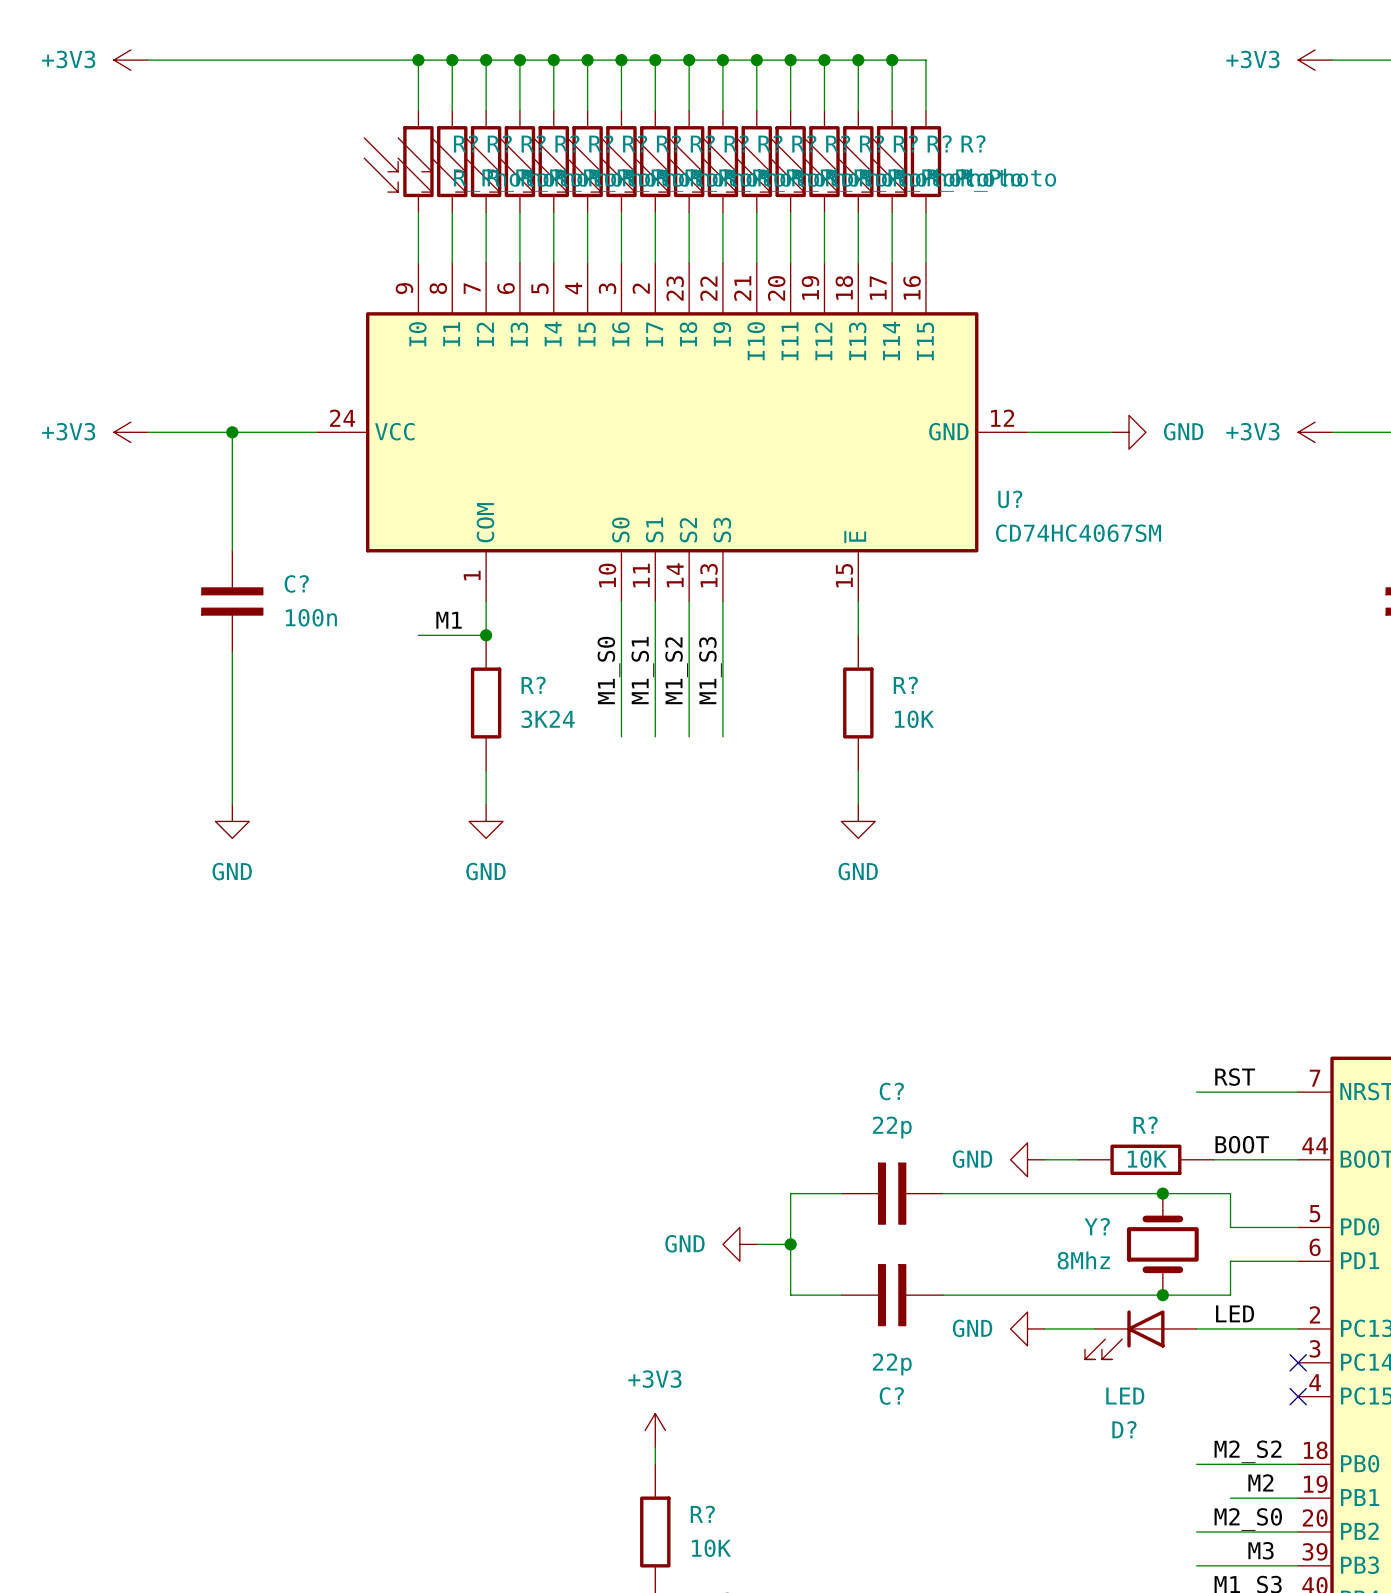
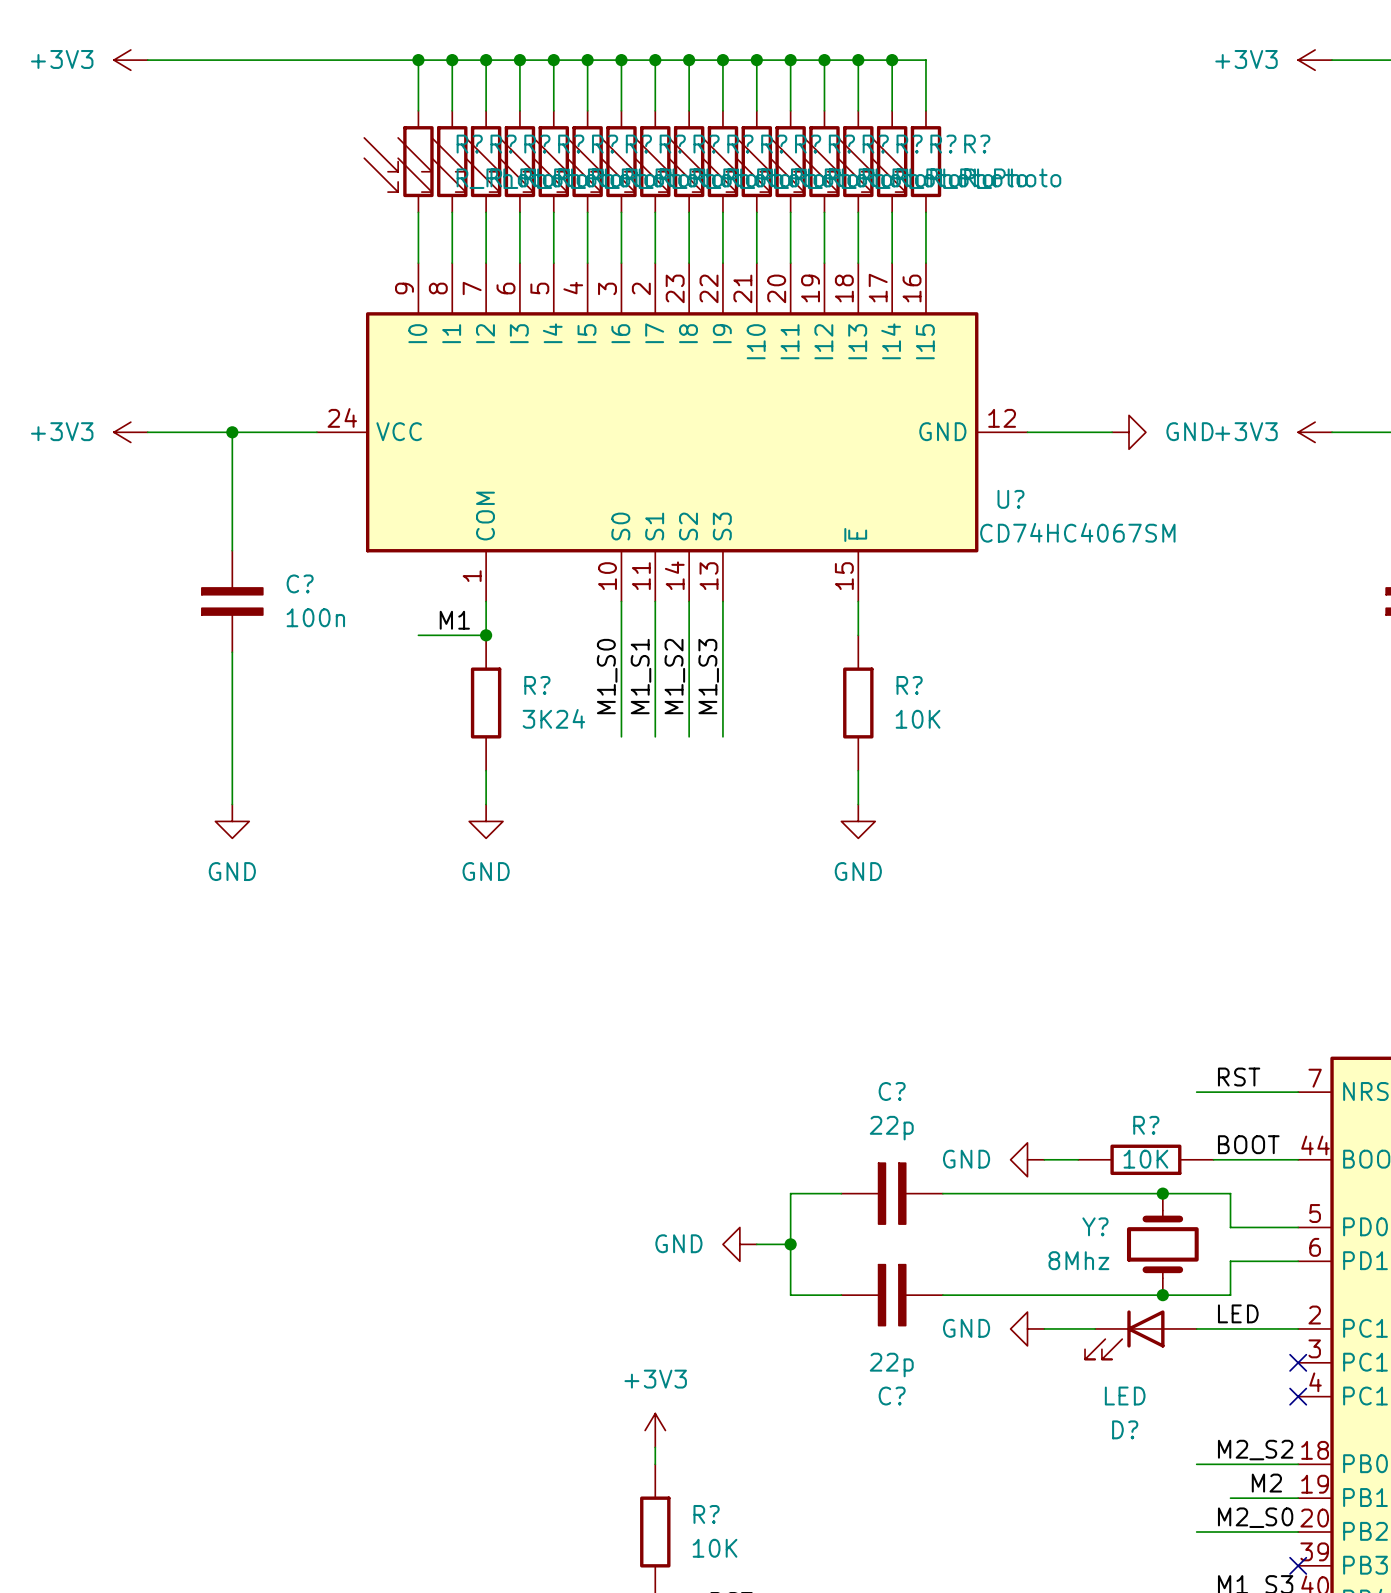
label: M3 (1261, 1550) -> none
wire: (1196, 1565) (1298, 1565) -> none
no-connect mark: none -> (1298, 1565)

